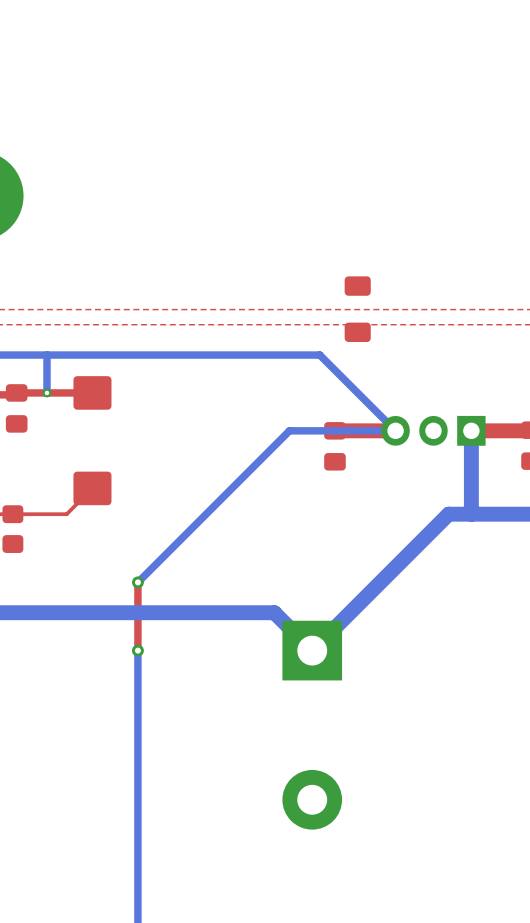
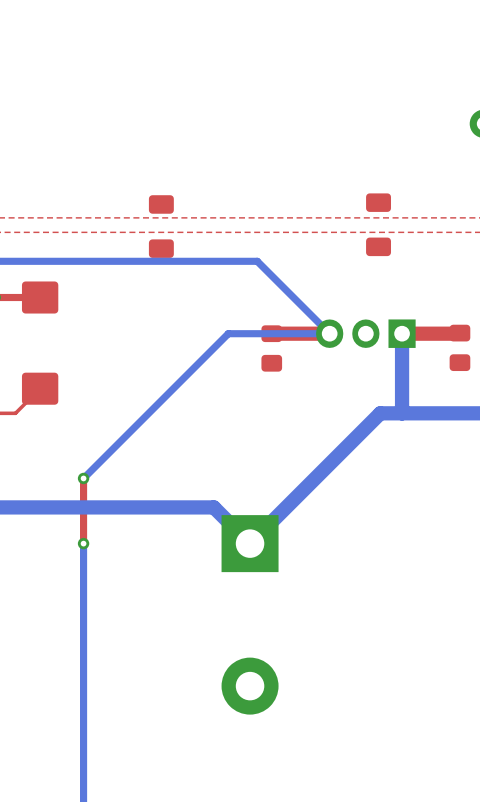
part: (357, 309) -> none
part: none -> (378, 224)
part: none -> (161, 226)

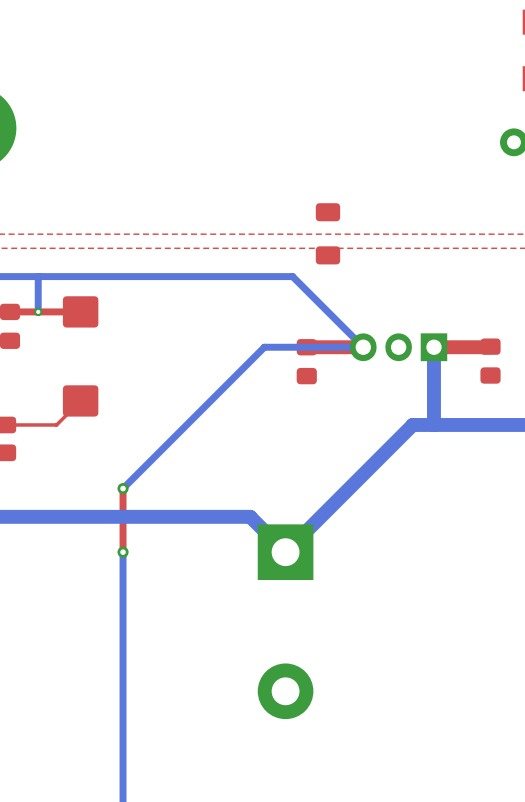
part: none -> (327, 233)
part: (378, 224) -> none
part: (161, 226) -> none

